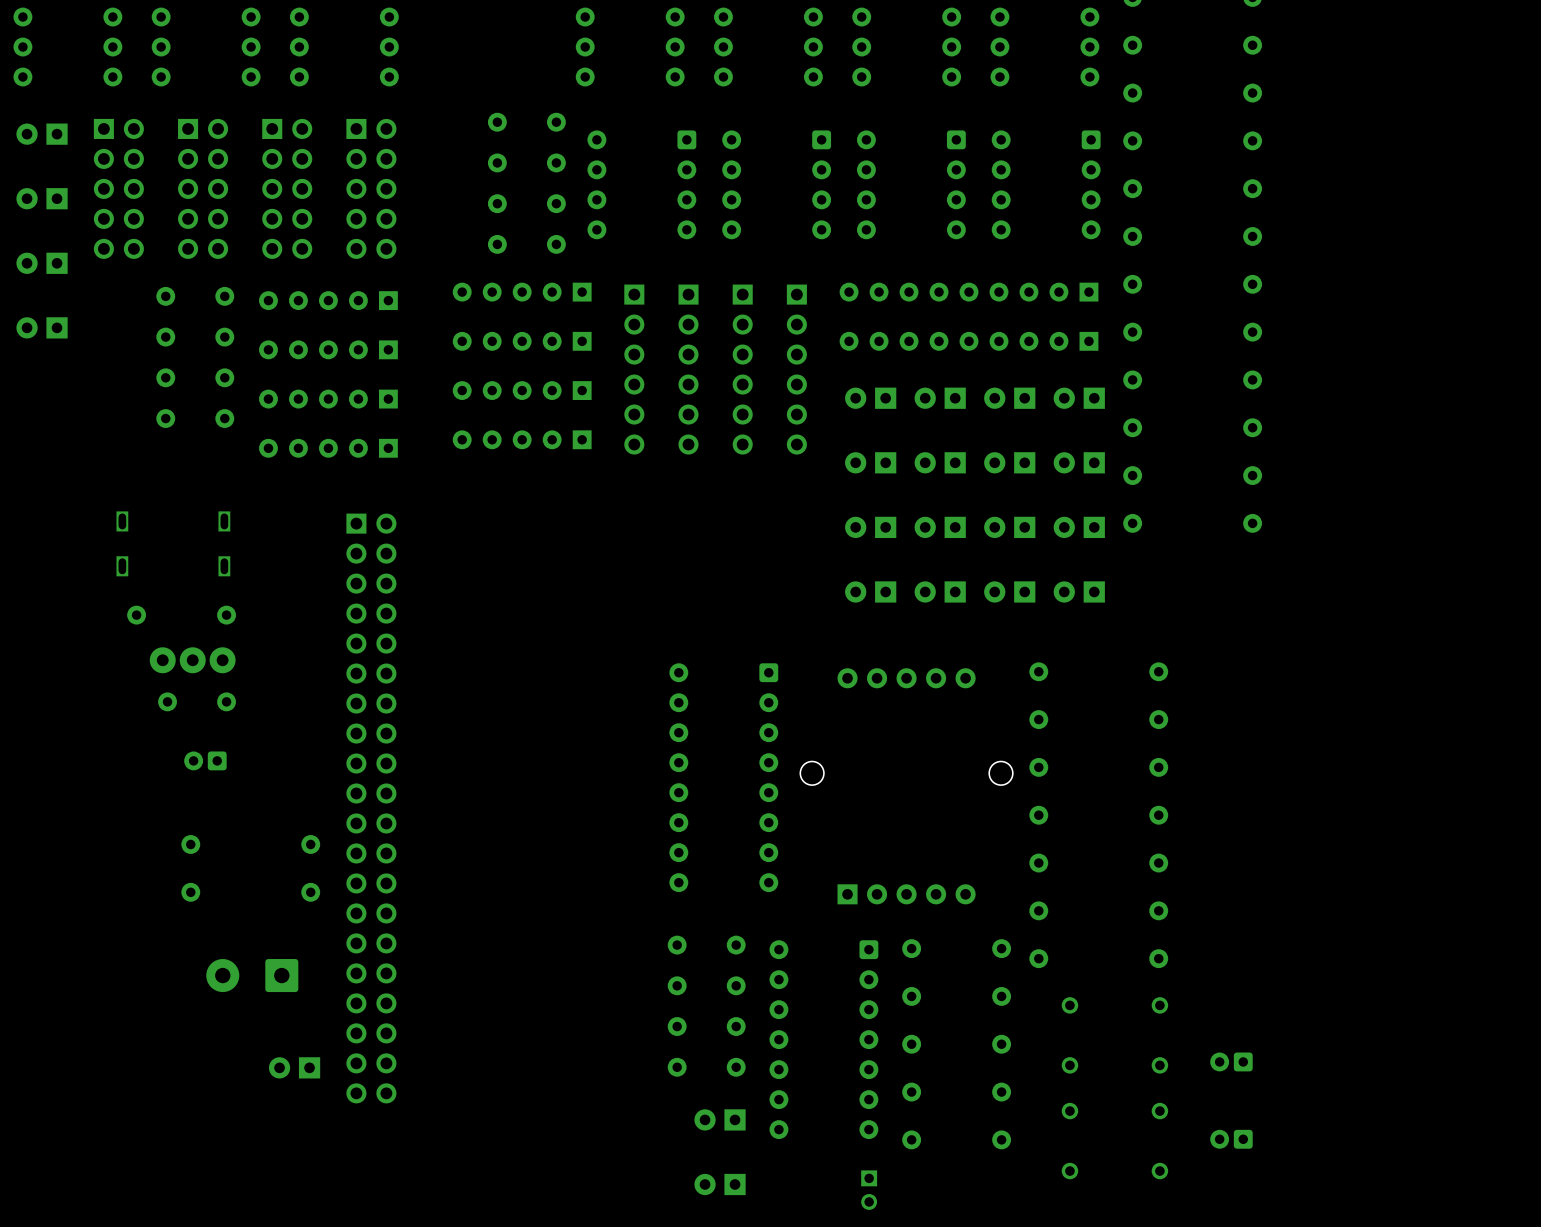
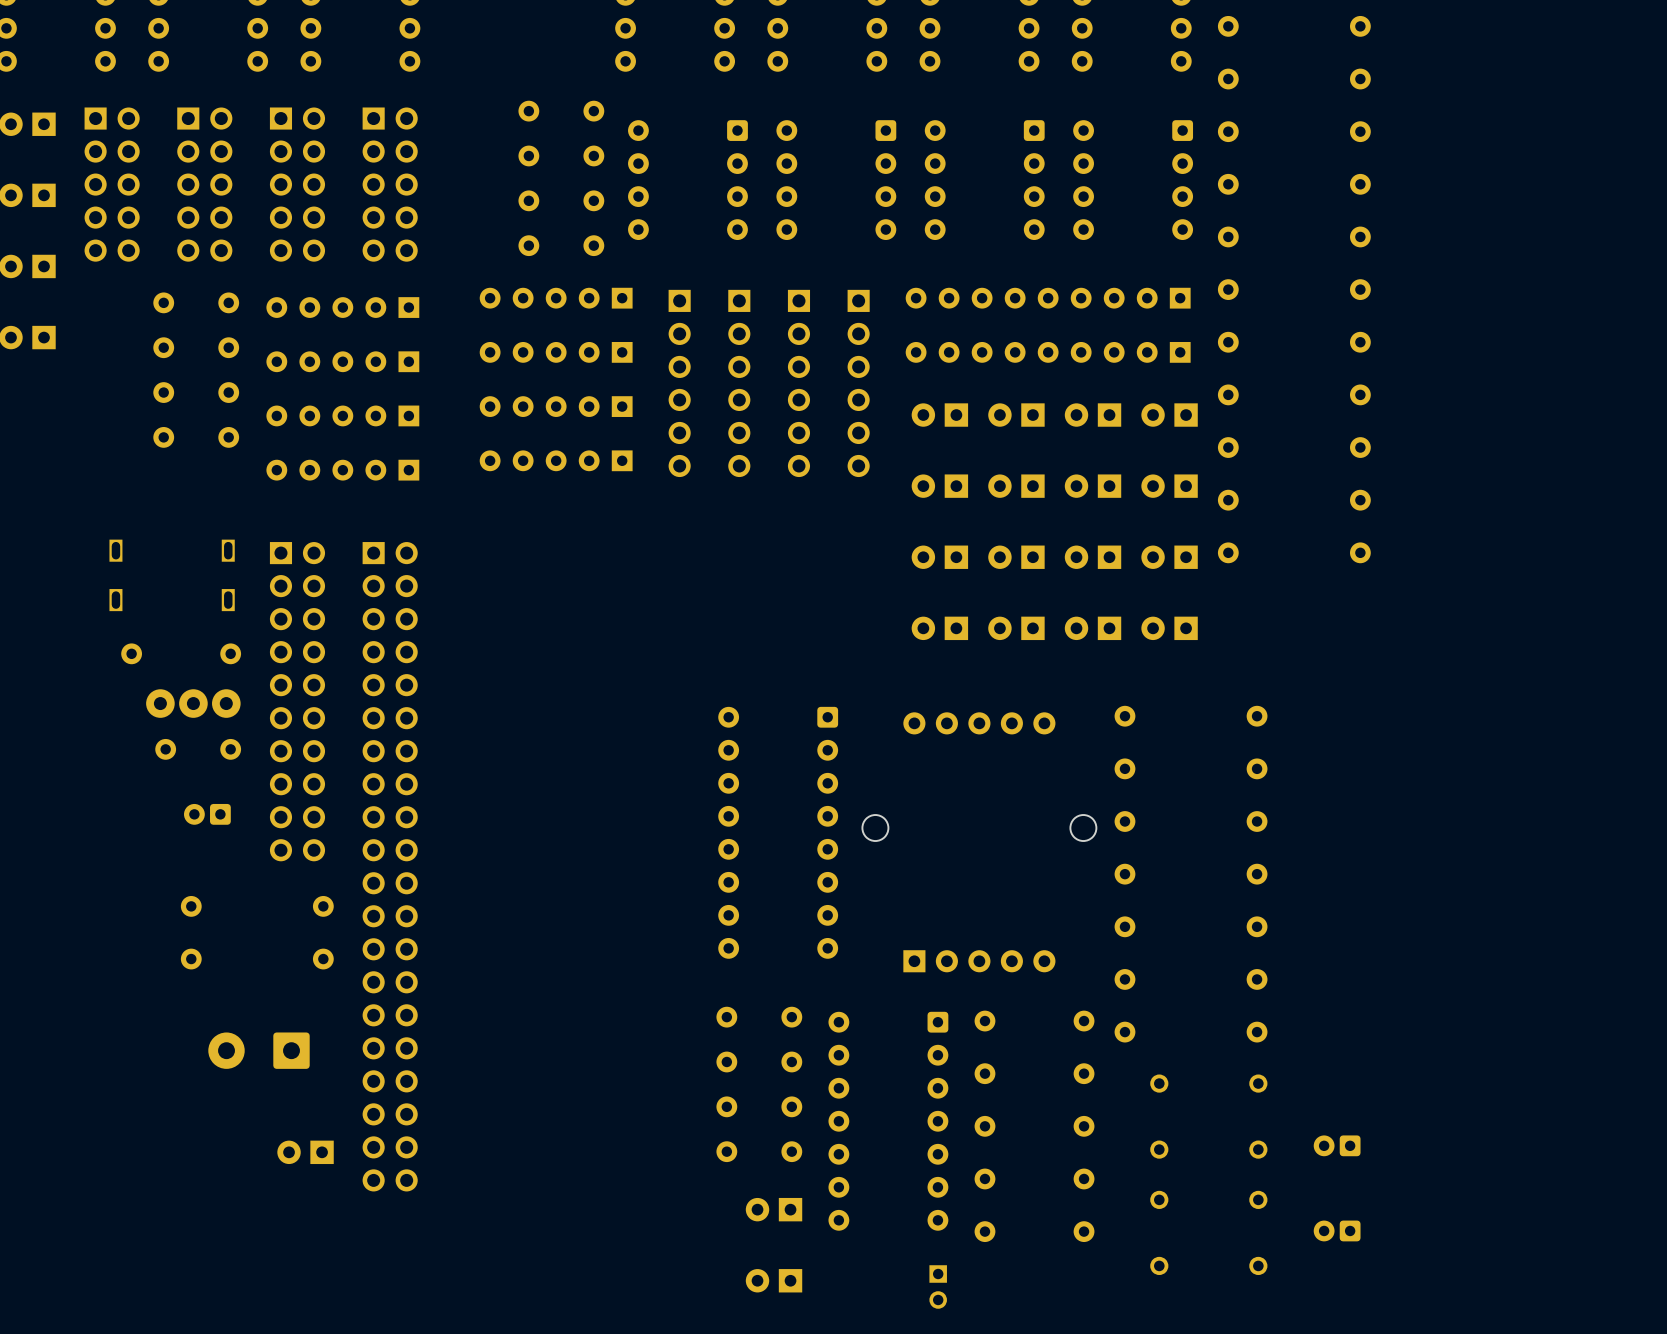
part: none -> (297, 701)

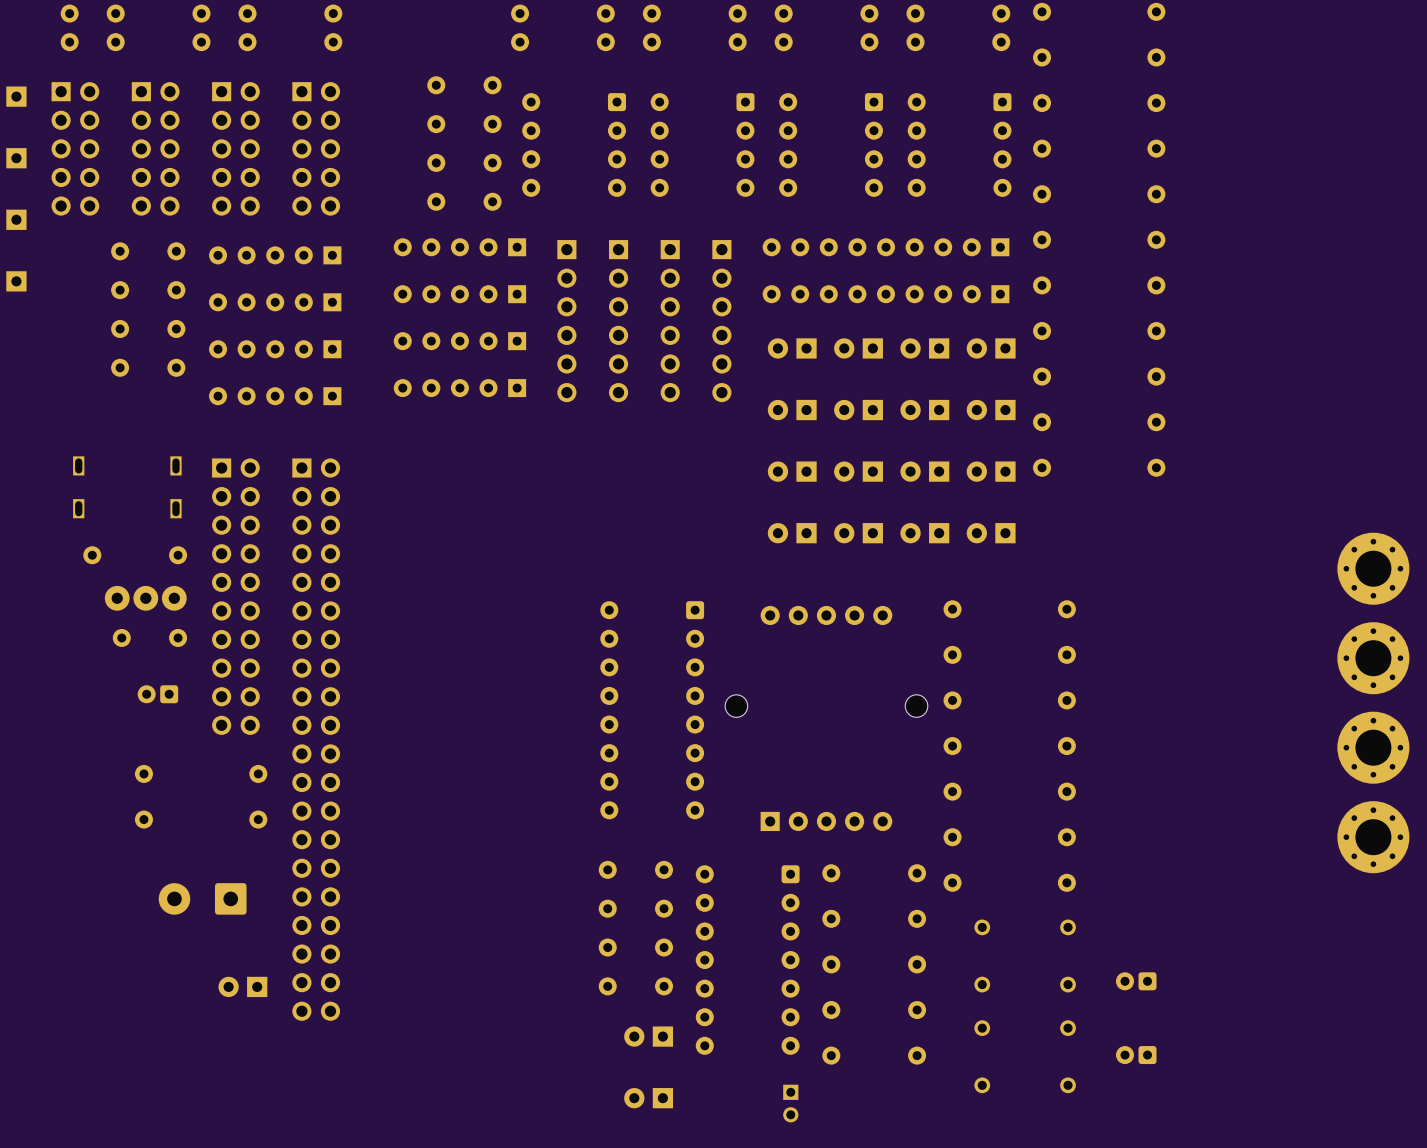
part: none -> (1373, 568)
part: none -> (1373, 658)
part: none -> (1373, 747)
part: none -> (1373, 837)

